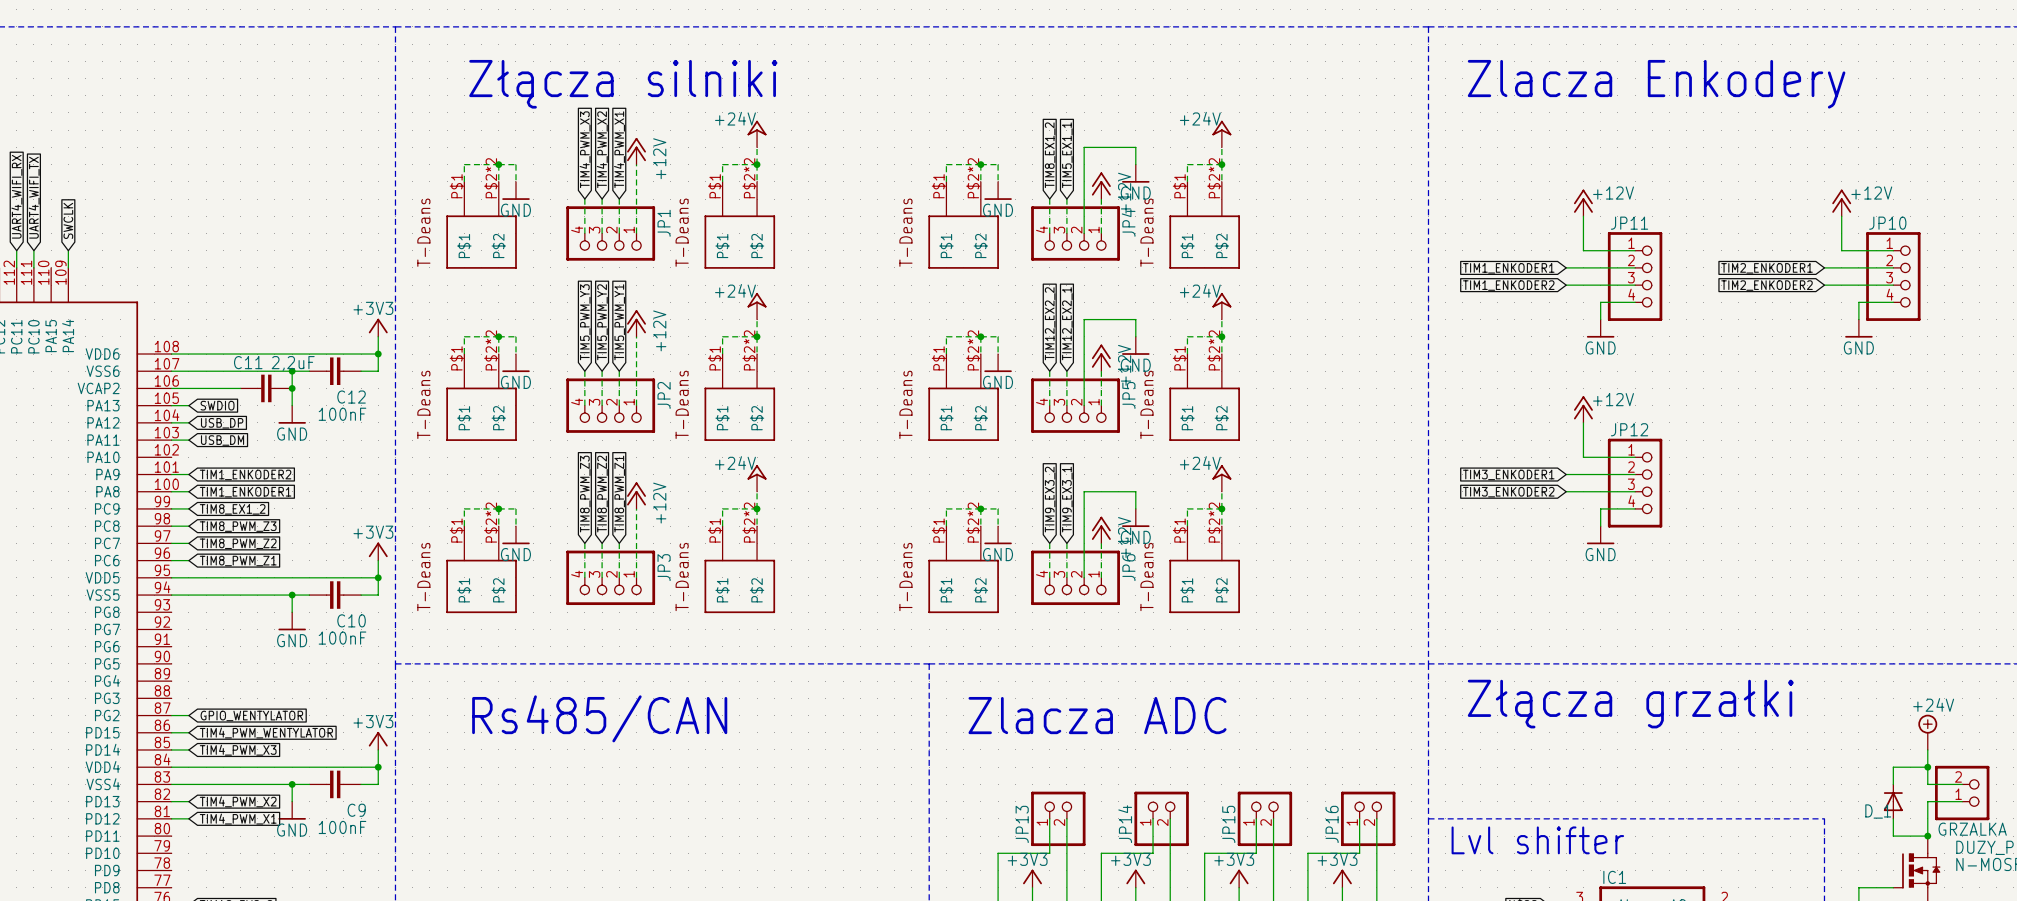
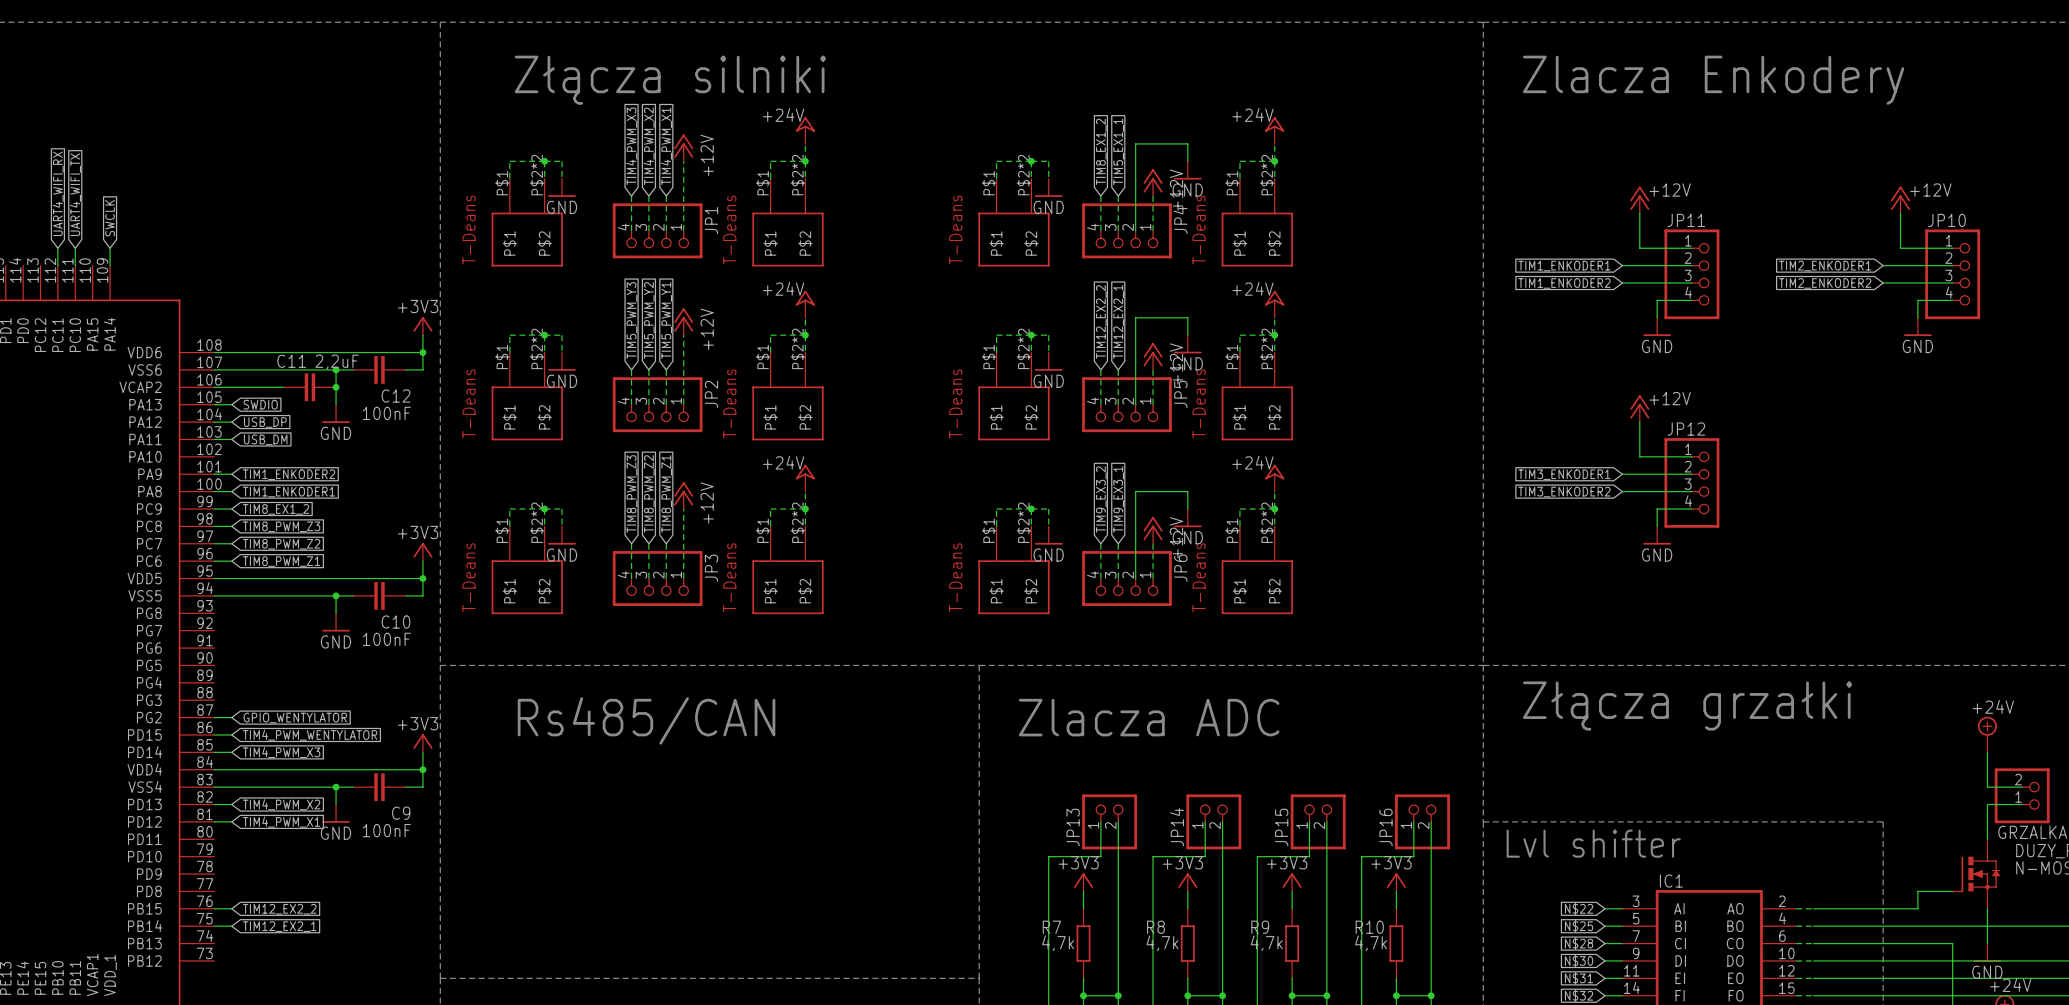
wire: (1927, 767) (1893, 767) (1893, 784) -> none
junction: (1927, 767) -> none
D_1: (1893, 801) -> none
wire: (1893, 818) (1893, 836) (1927, 836) -> none
junction: (1927, 836) -> none

